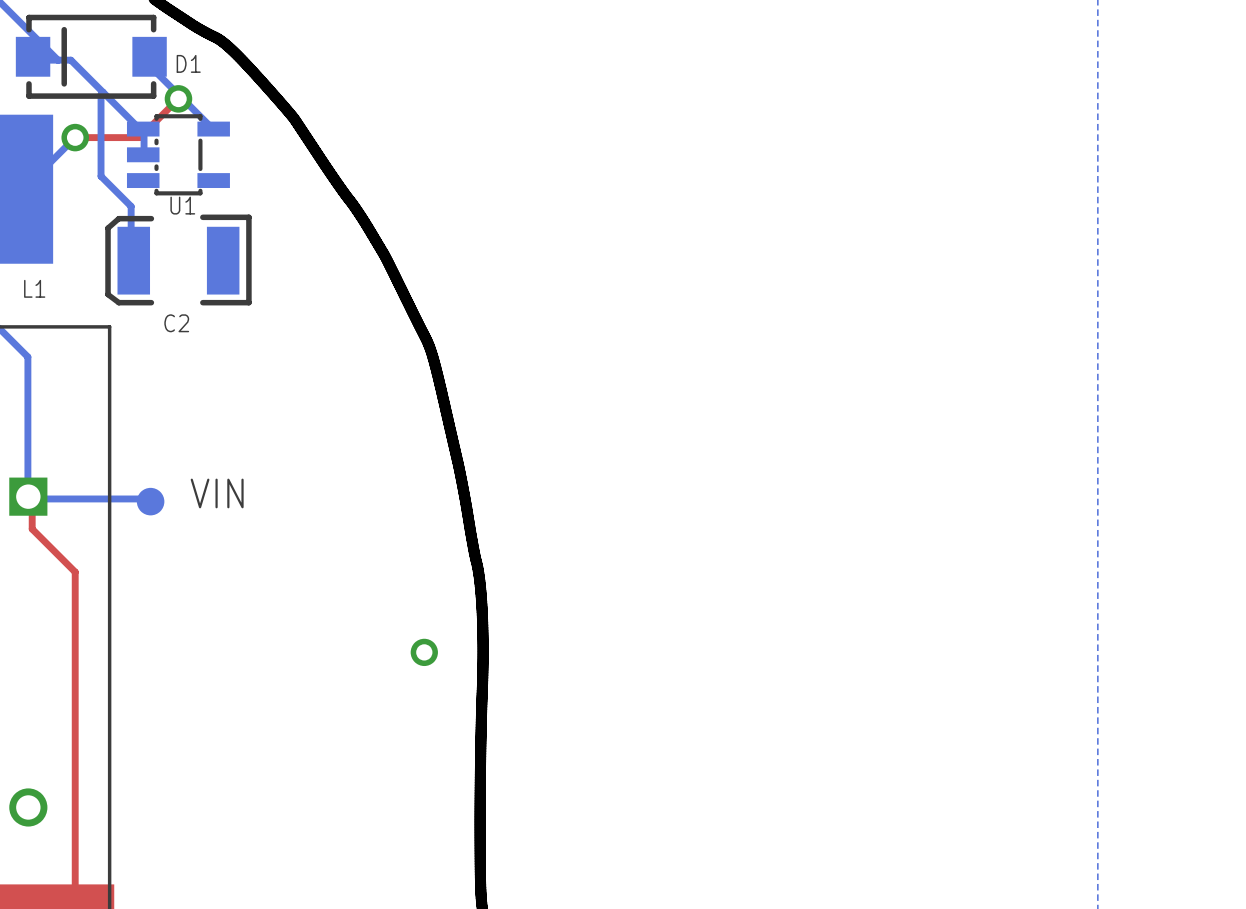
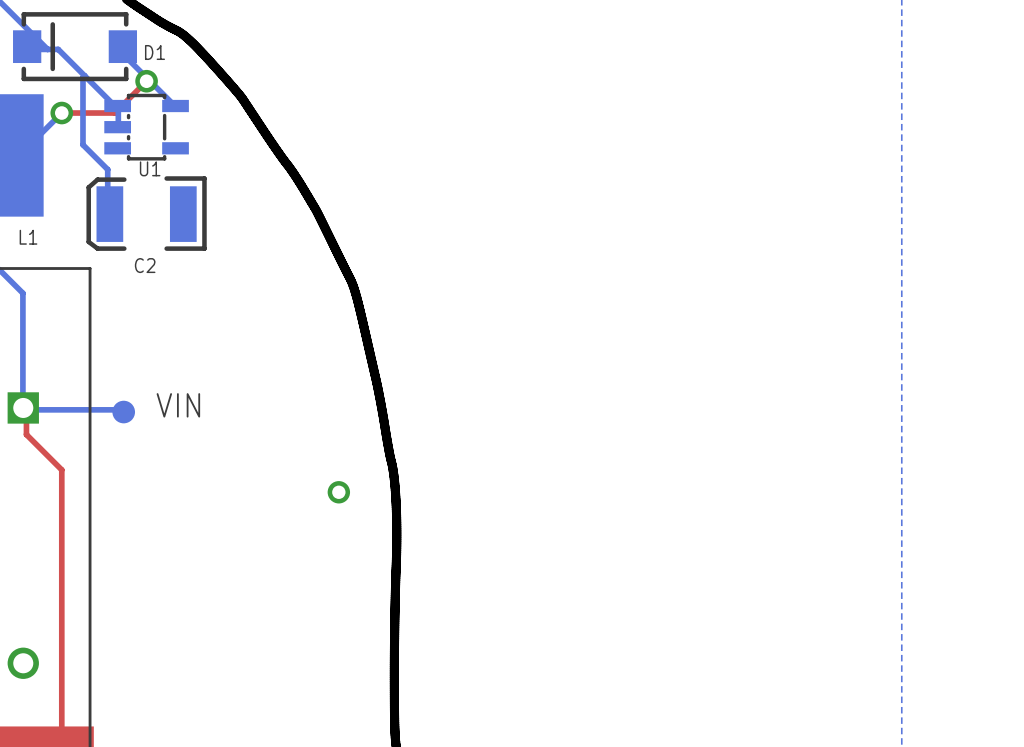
via position: (424, 652) -> (338, 492)

